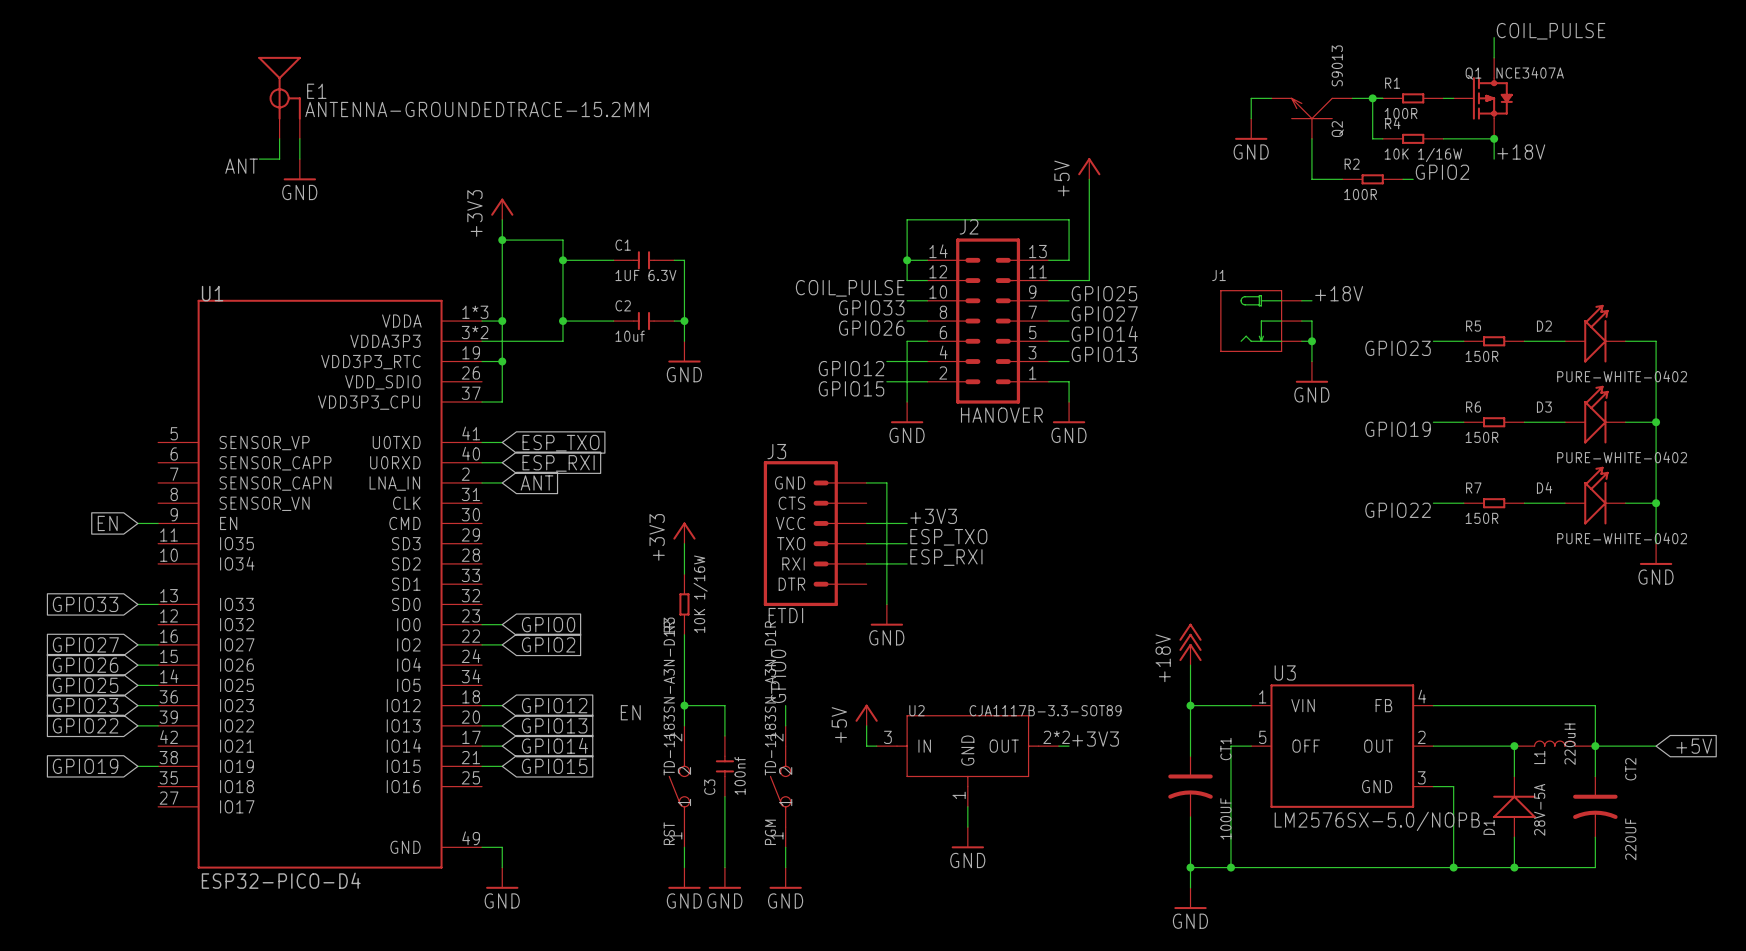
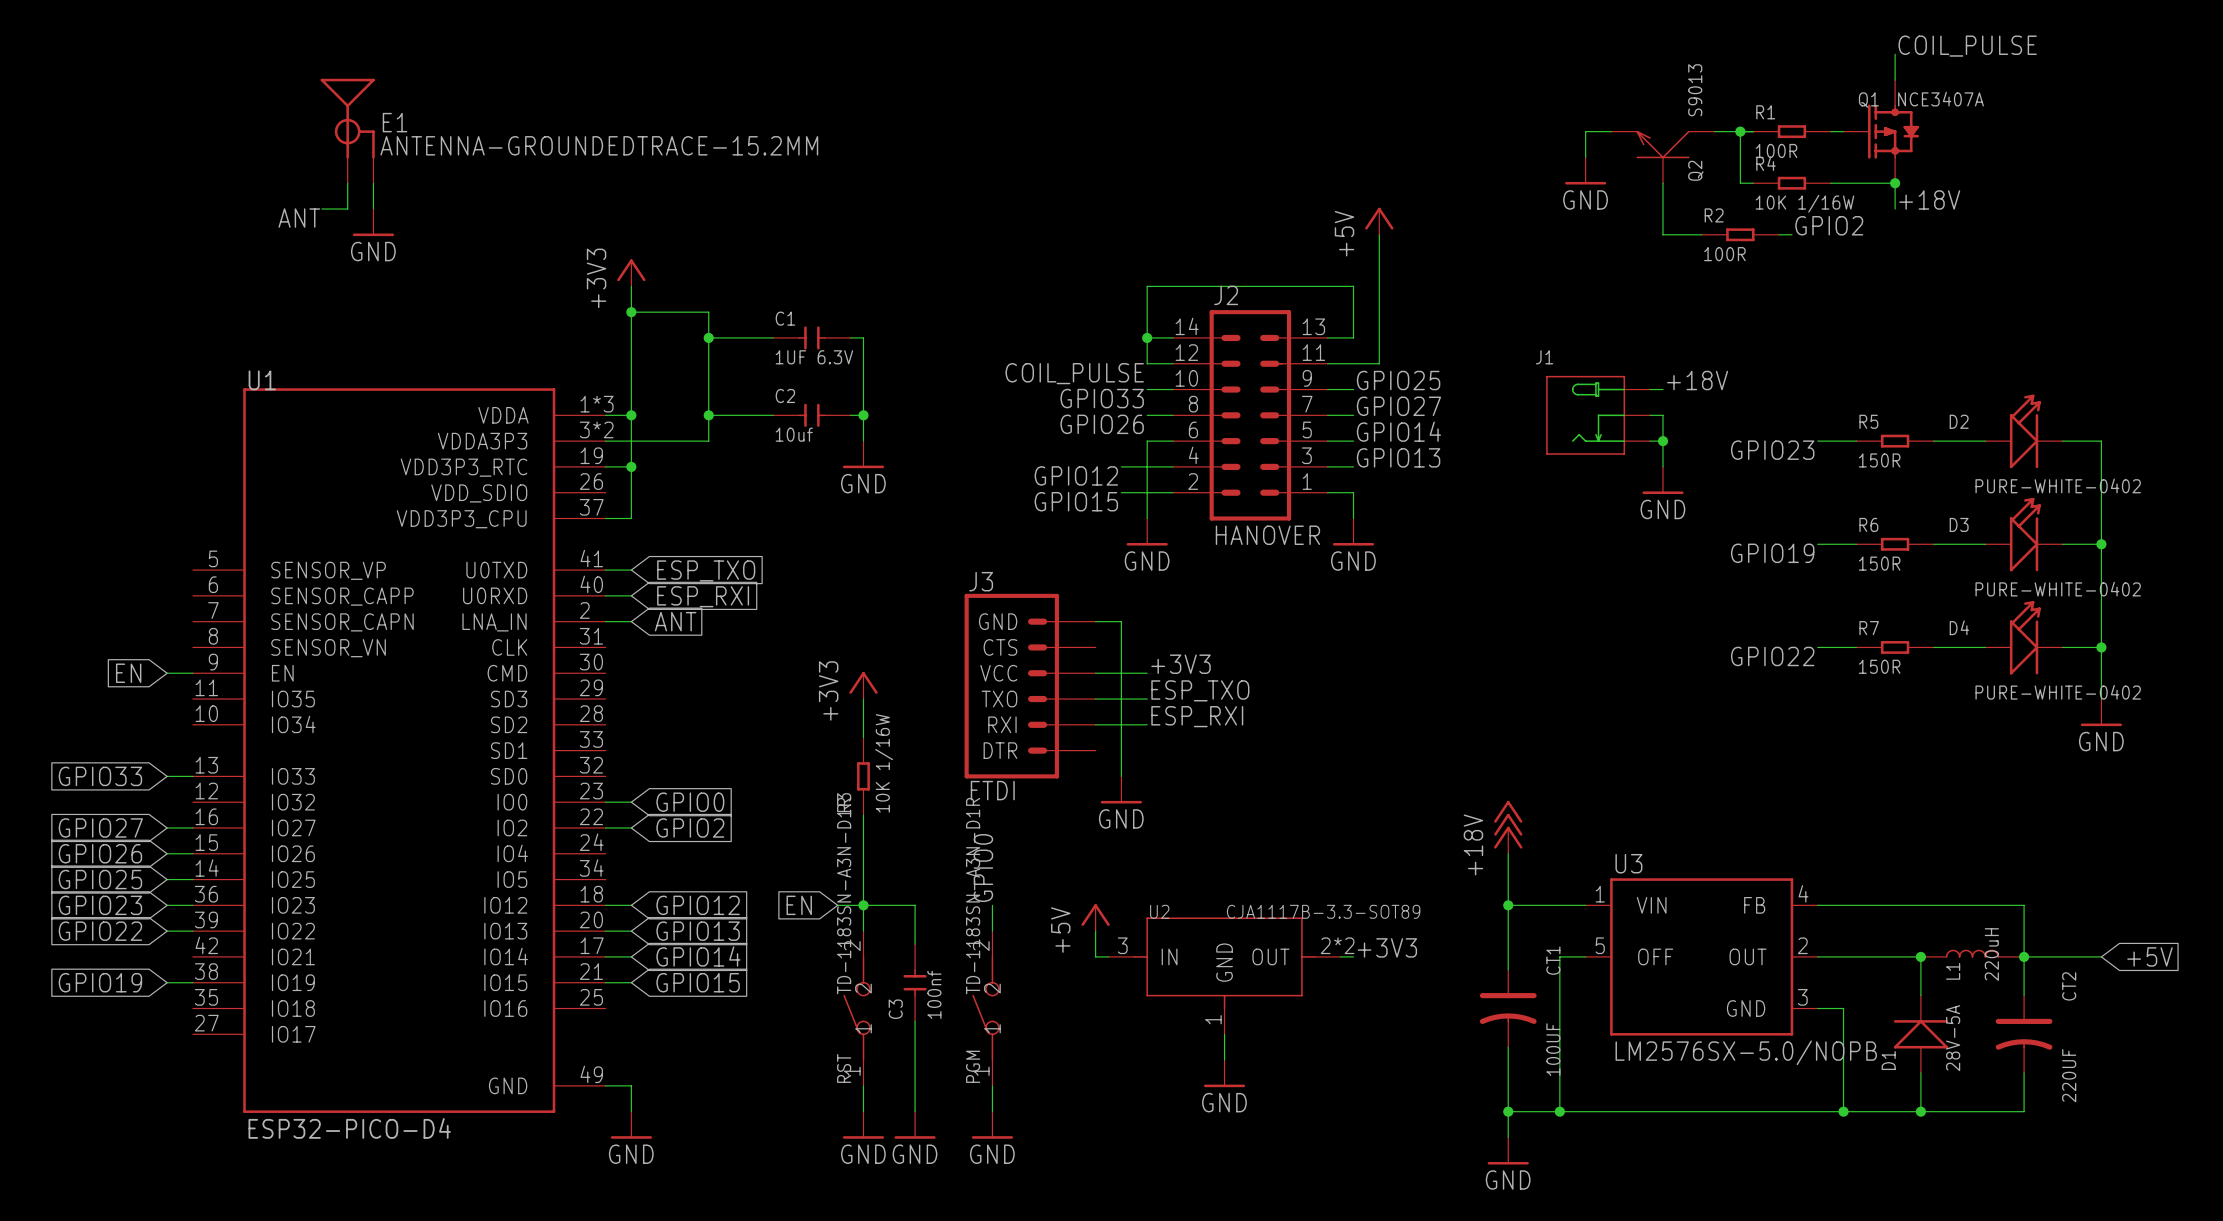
global label: none -> EN (799, 905)
wire: none -> (837, 905) (863, 905)
label: EN (630, 712) -> none

